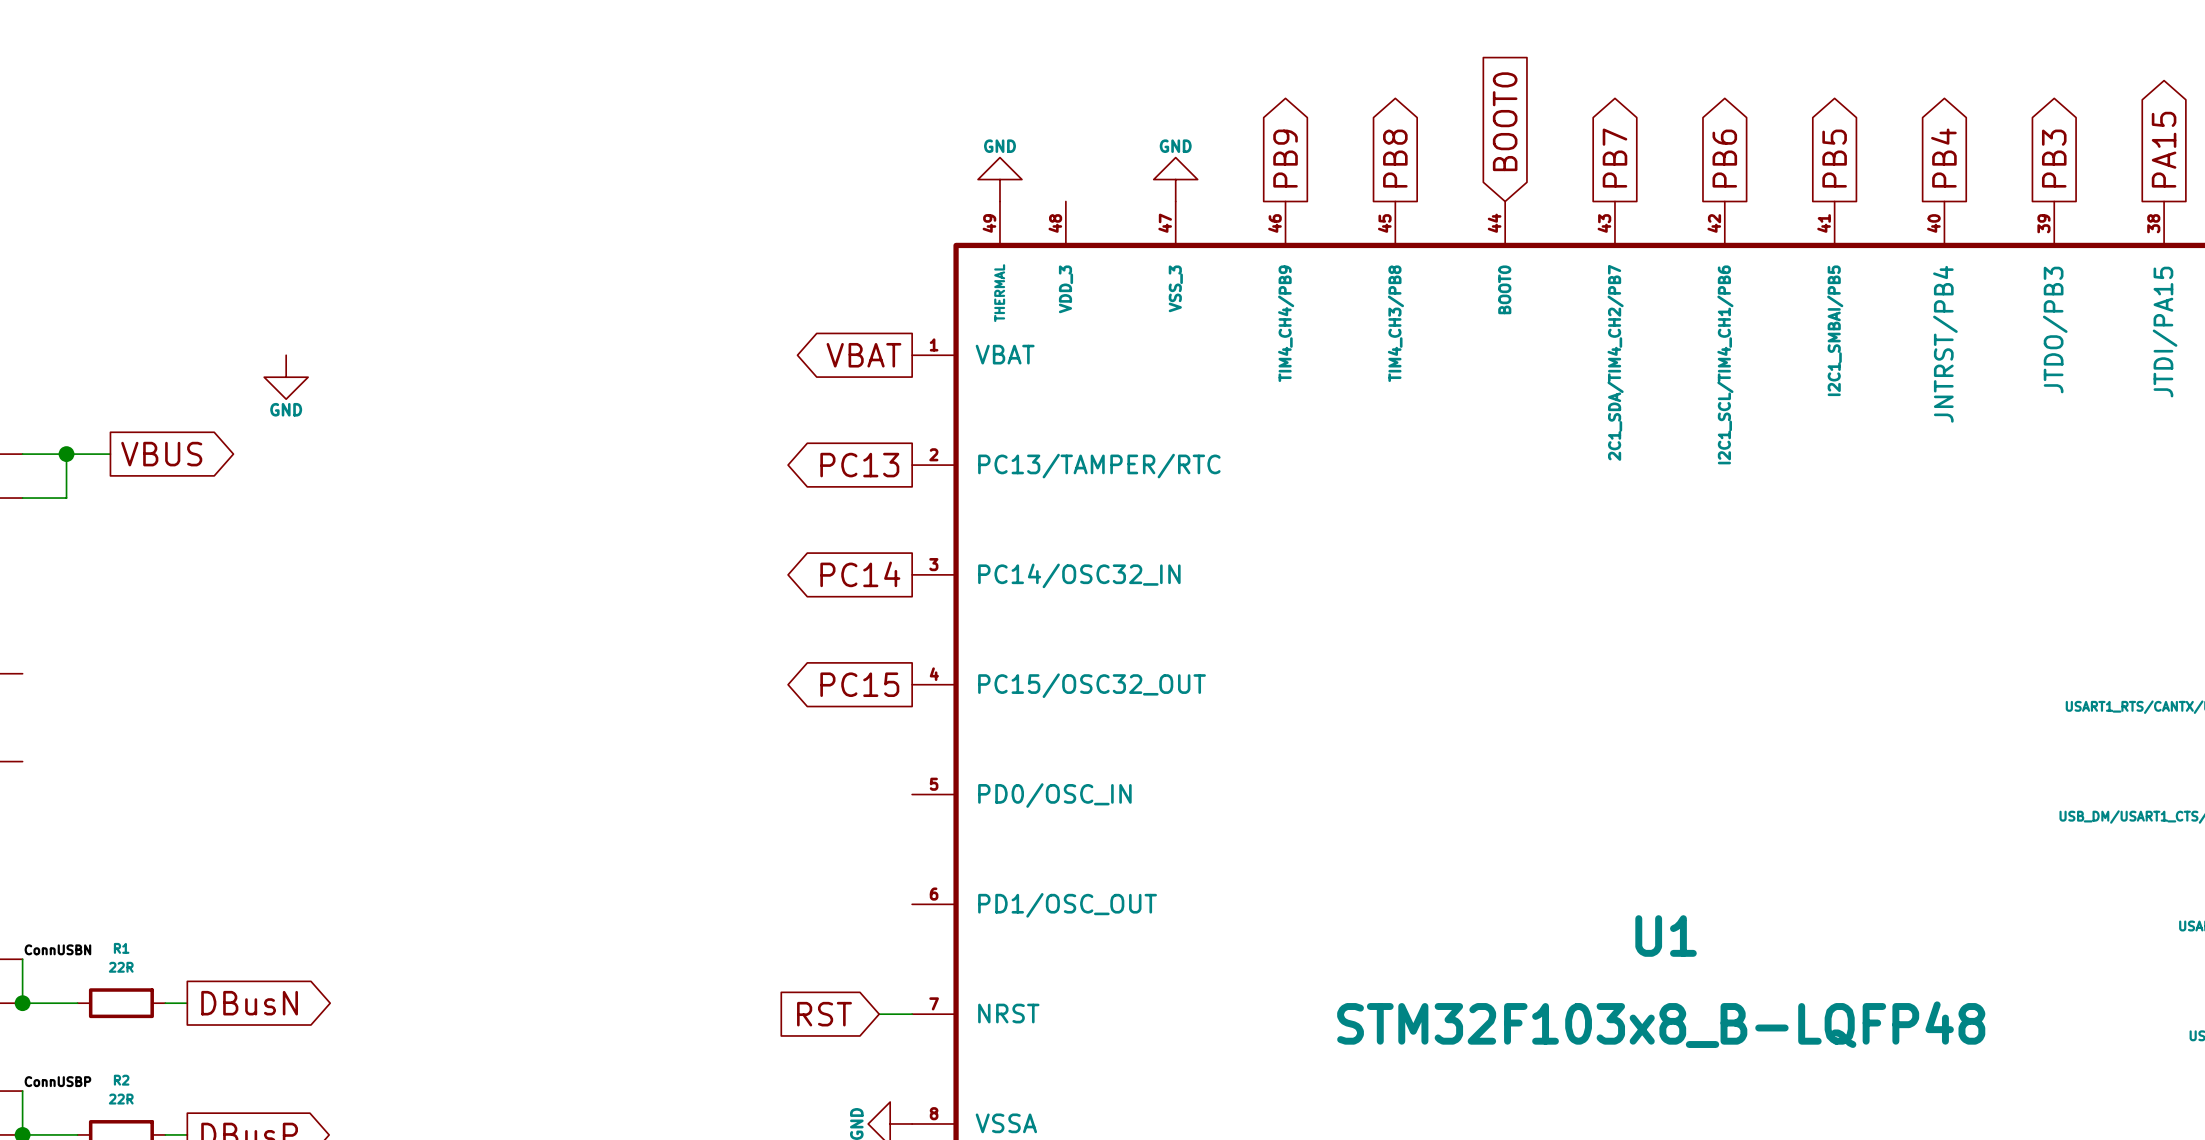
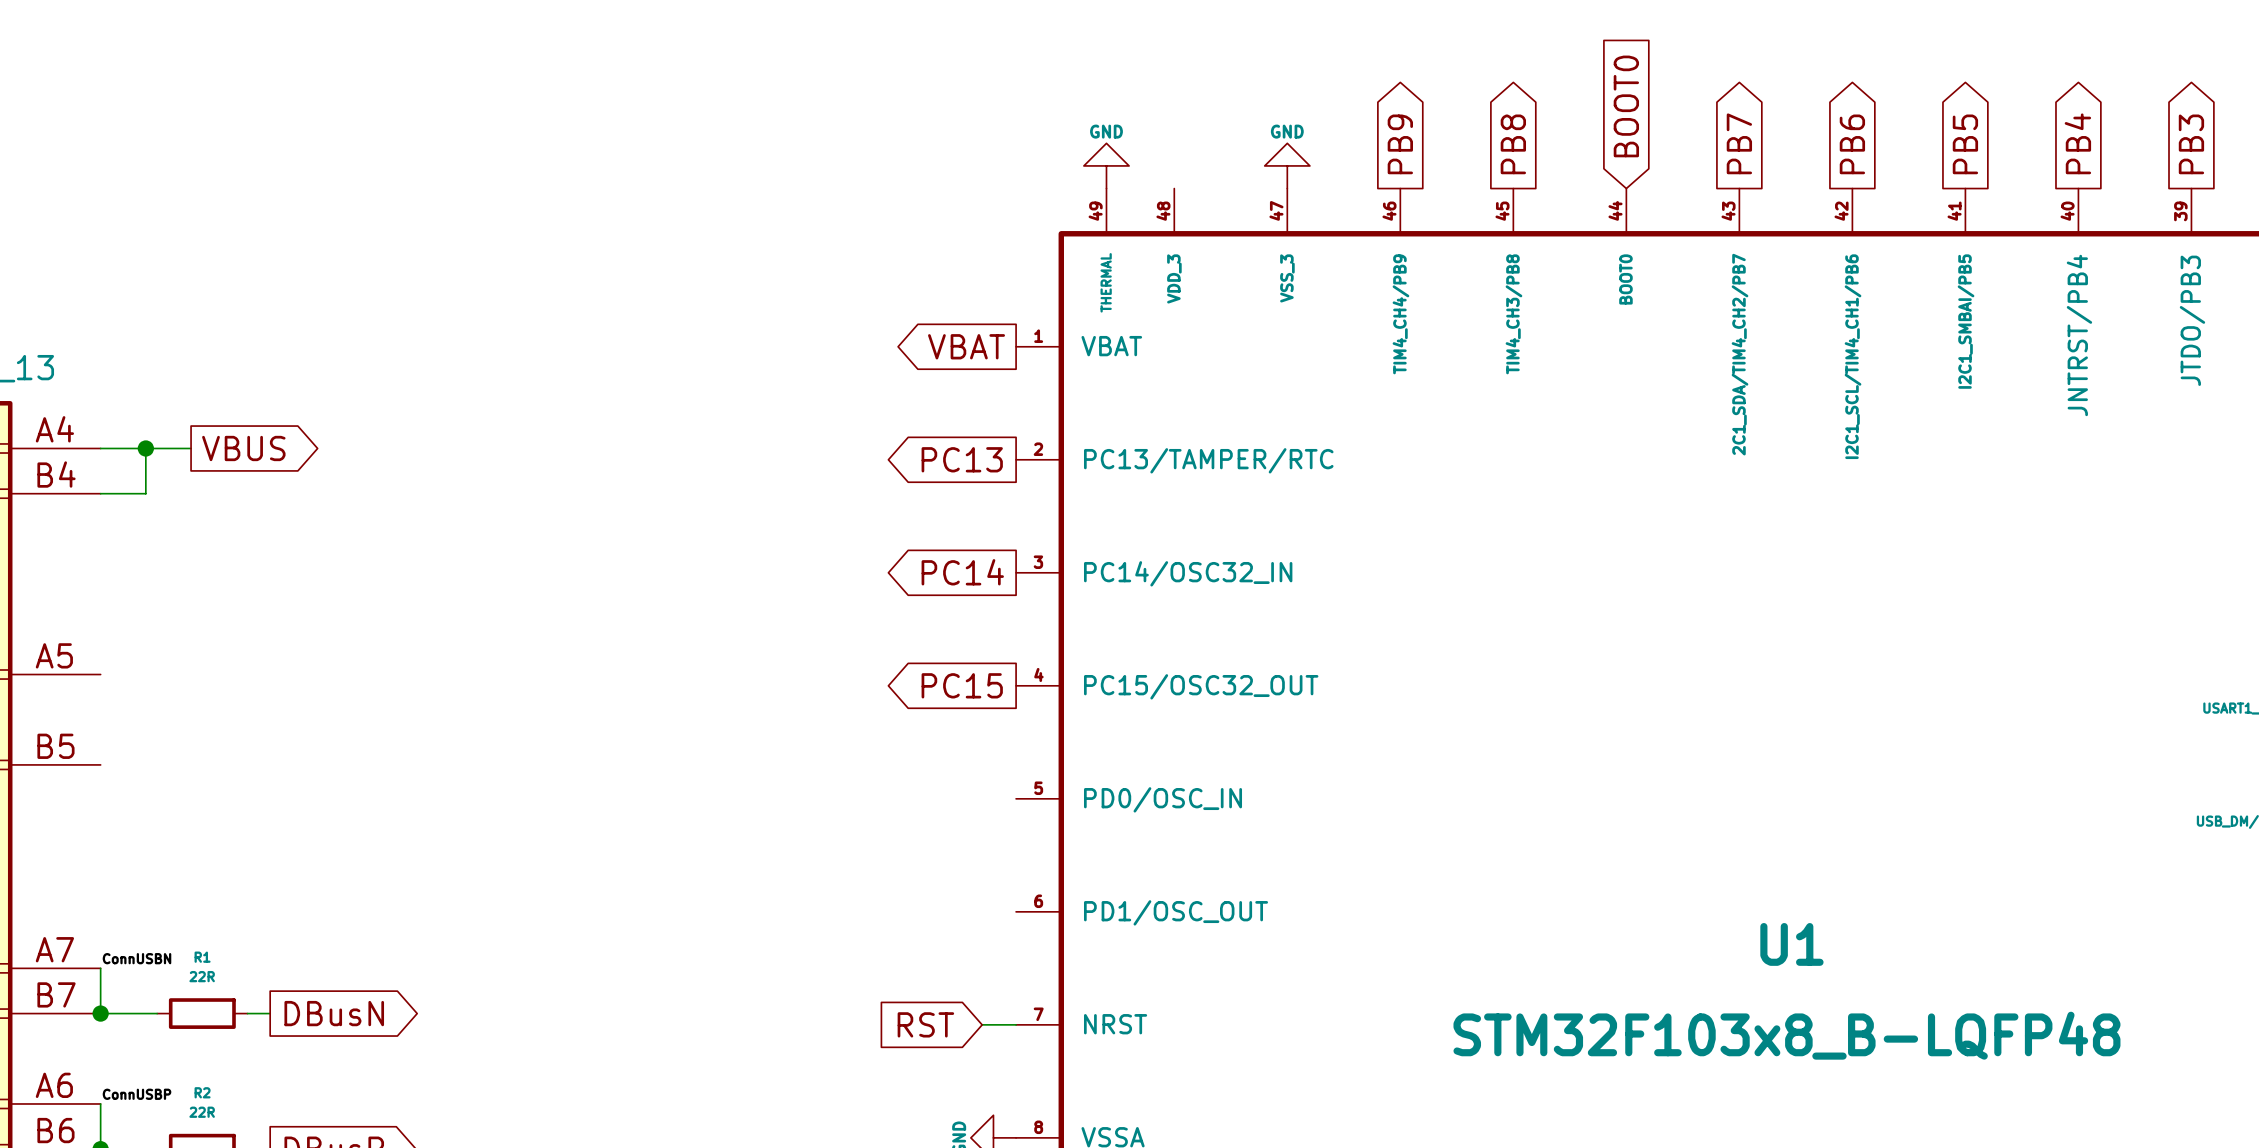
power symbol: GND (286, 377) -> none

